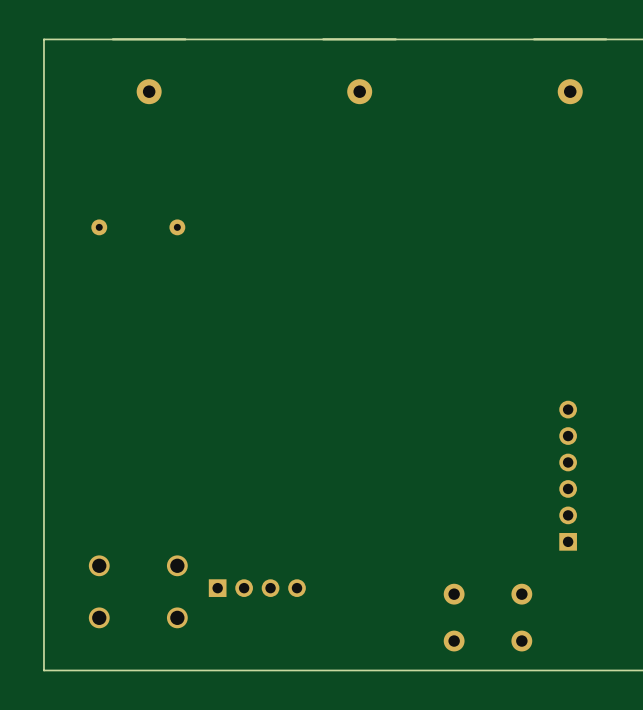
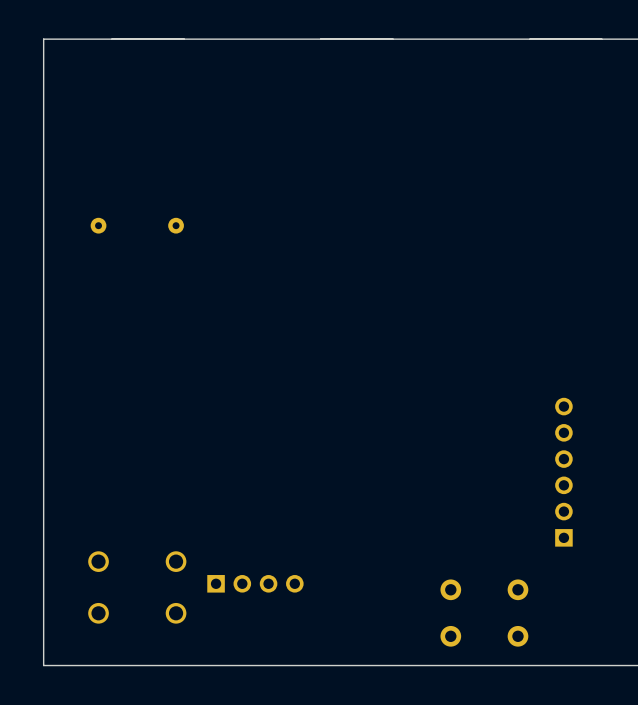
part: (149, 91) -> none
part: (359, 91) -> none
part: (570, 91) -> none

